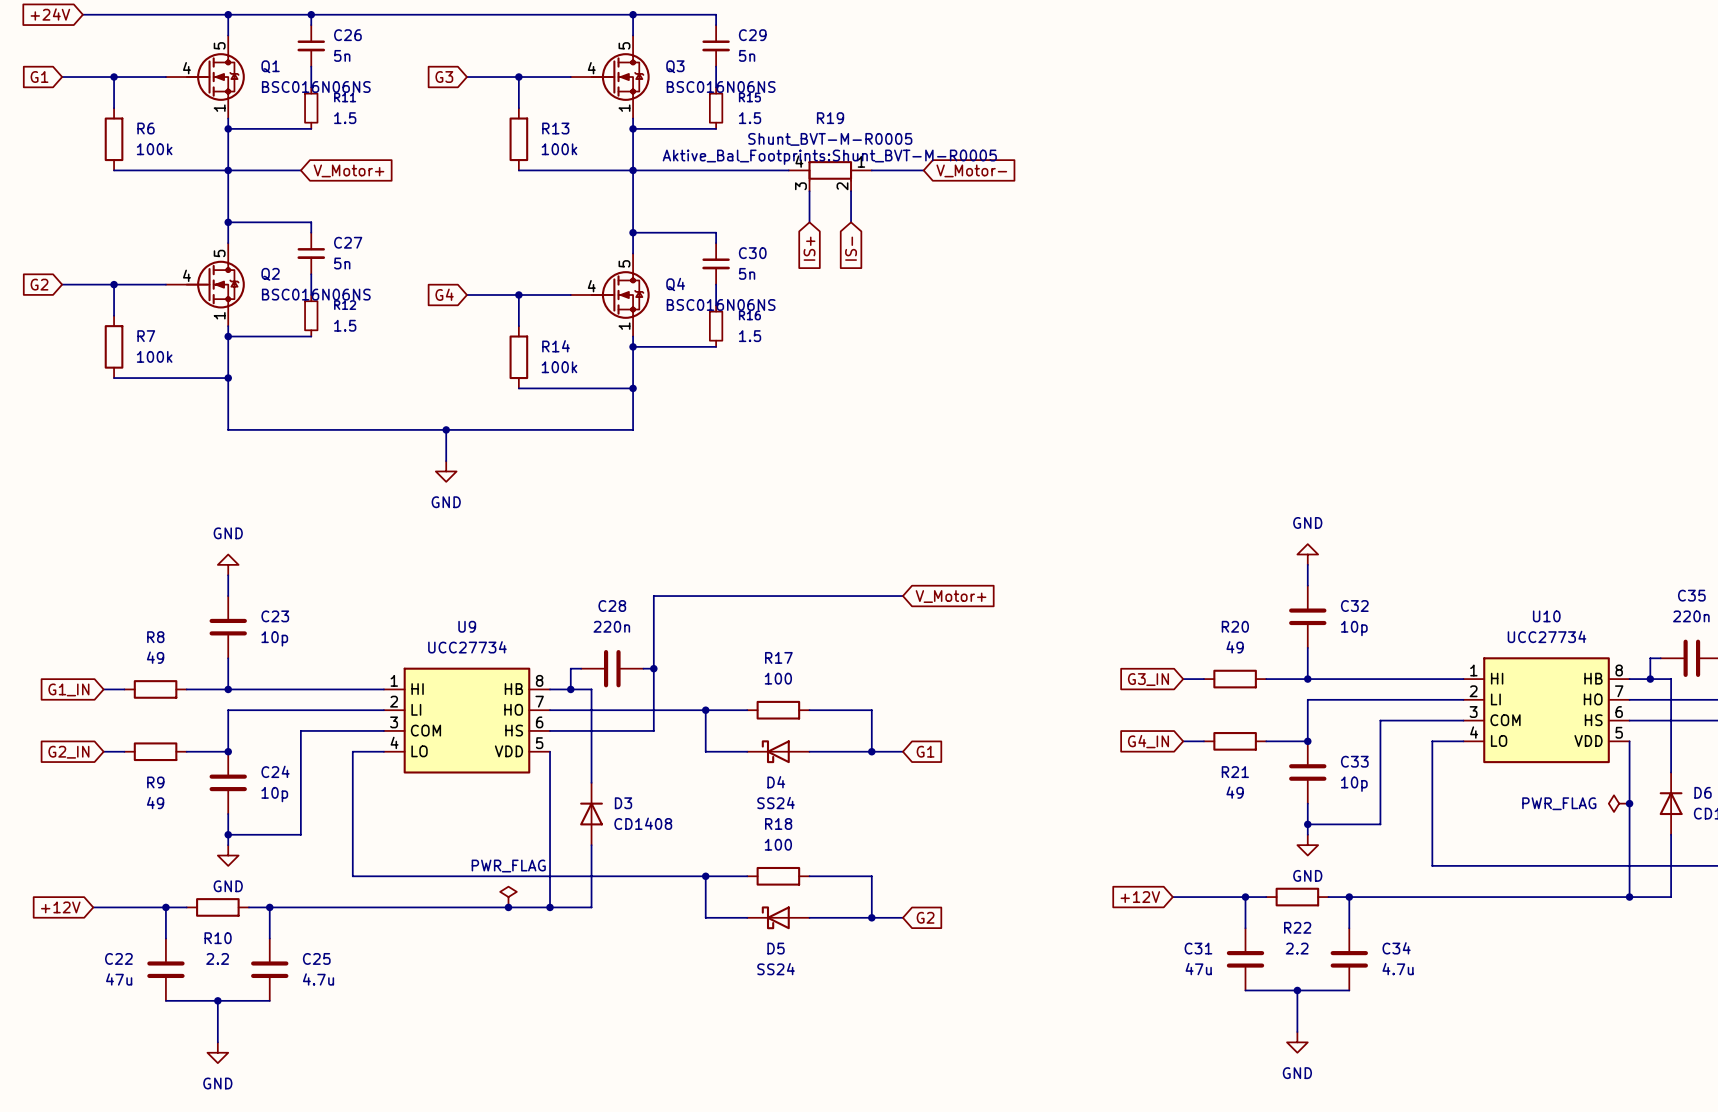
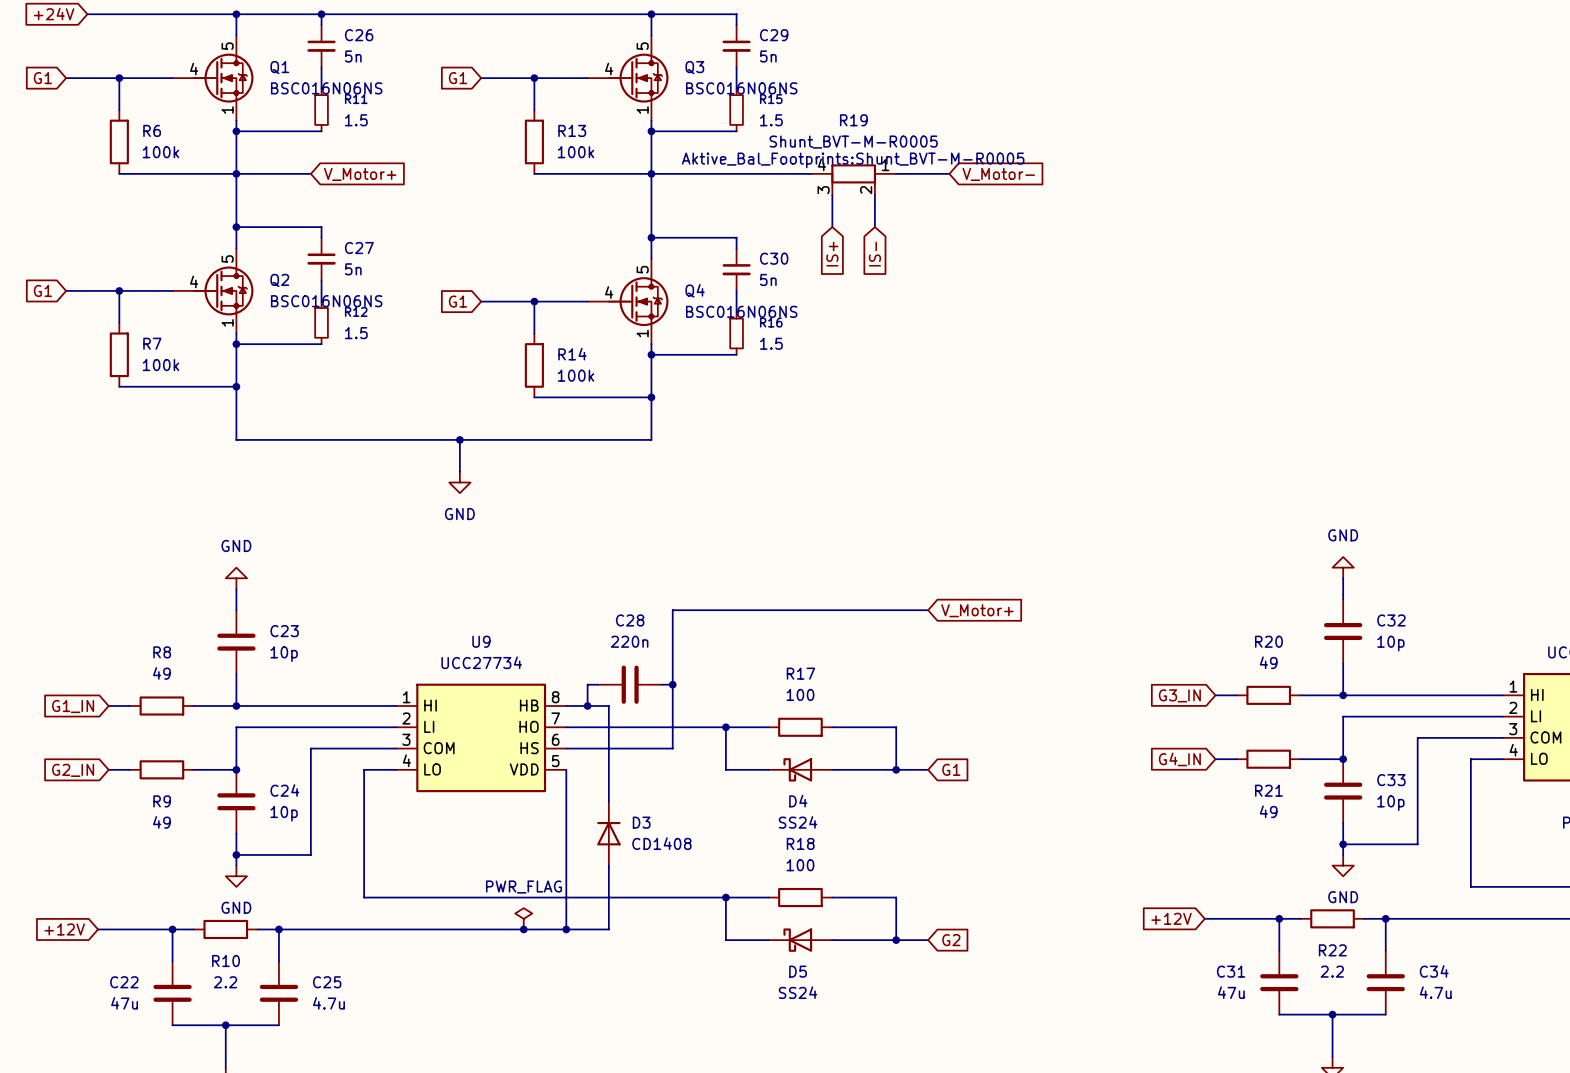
global label: G3 (444, 77) -> G1 (457, 78)
global label: G2 (39, 284) -> G1 (42, 290)
global label: G4 (444, 294) -> G1 (457, 301)

